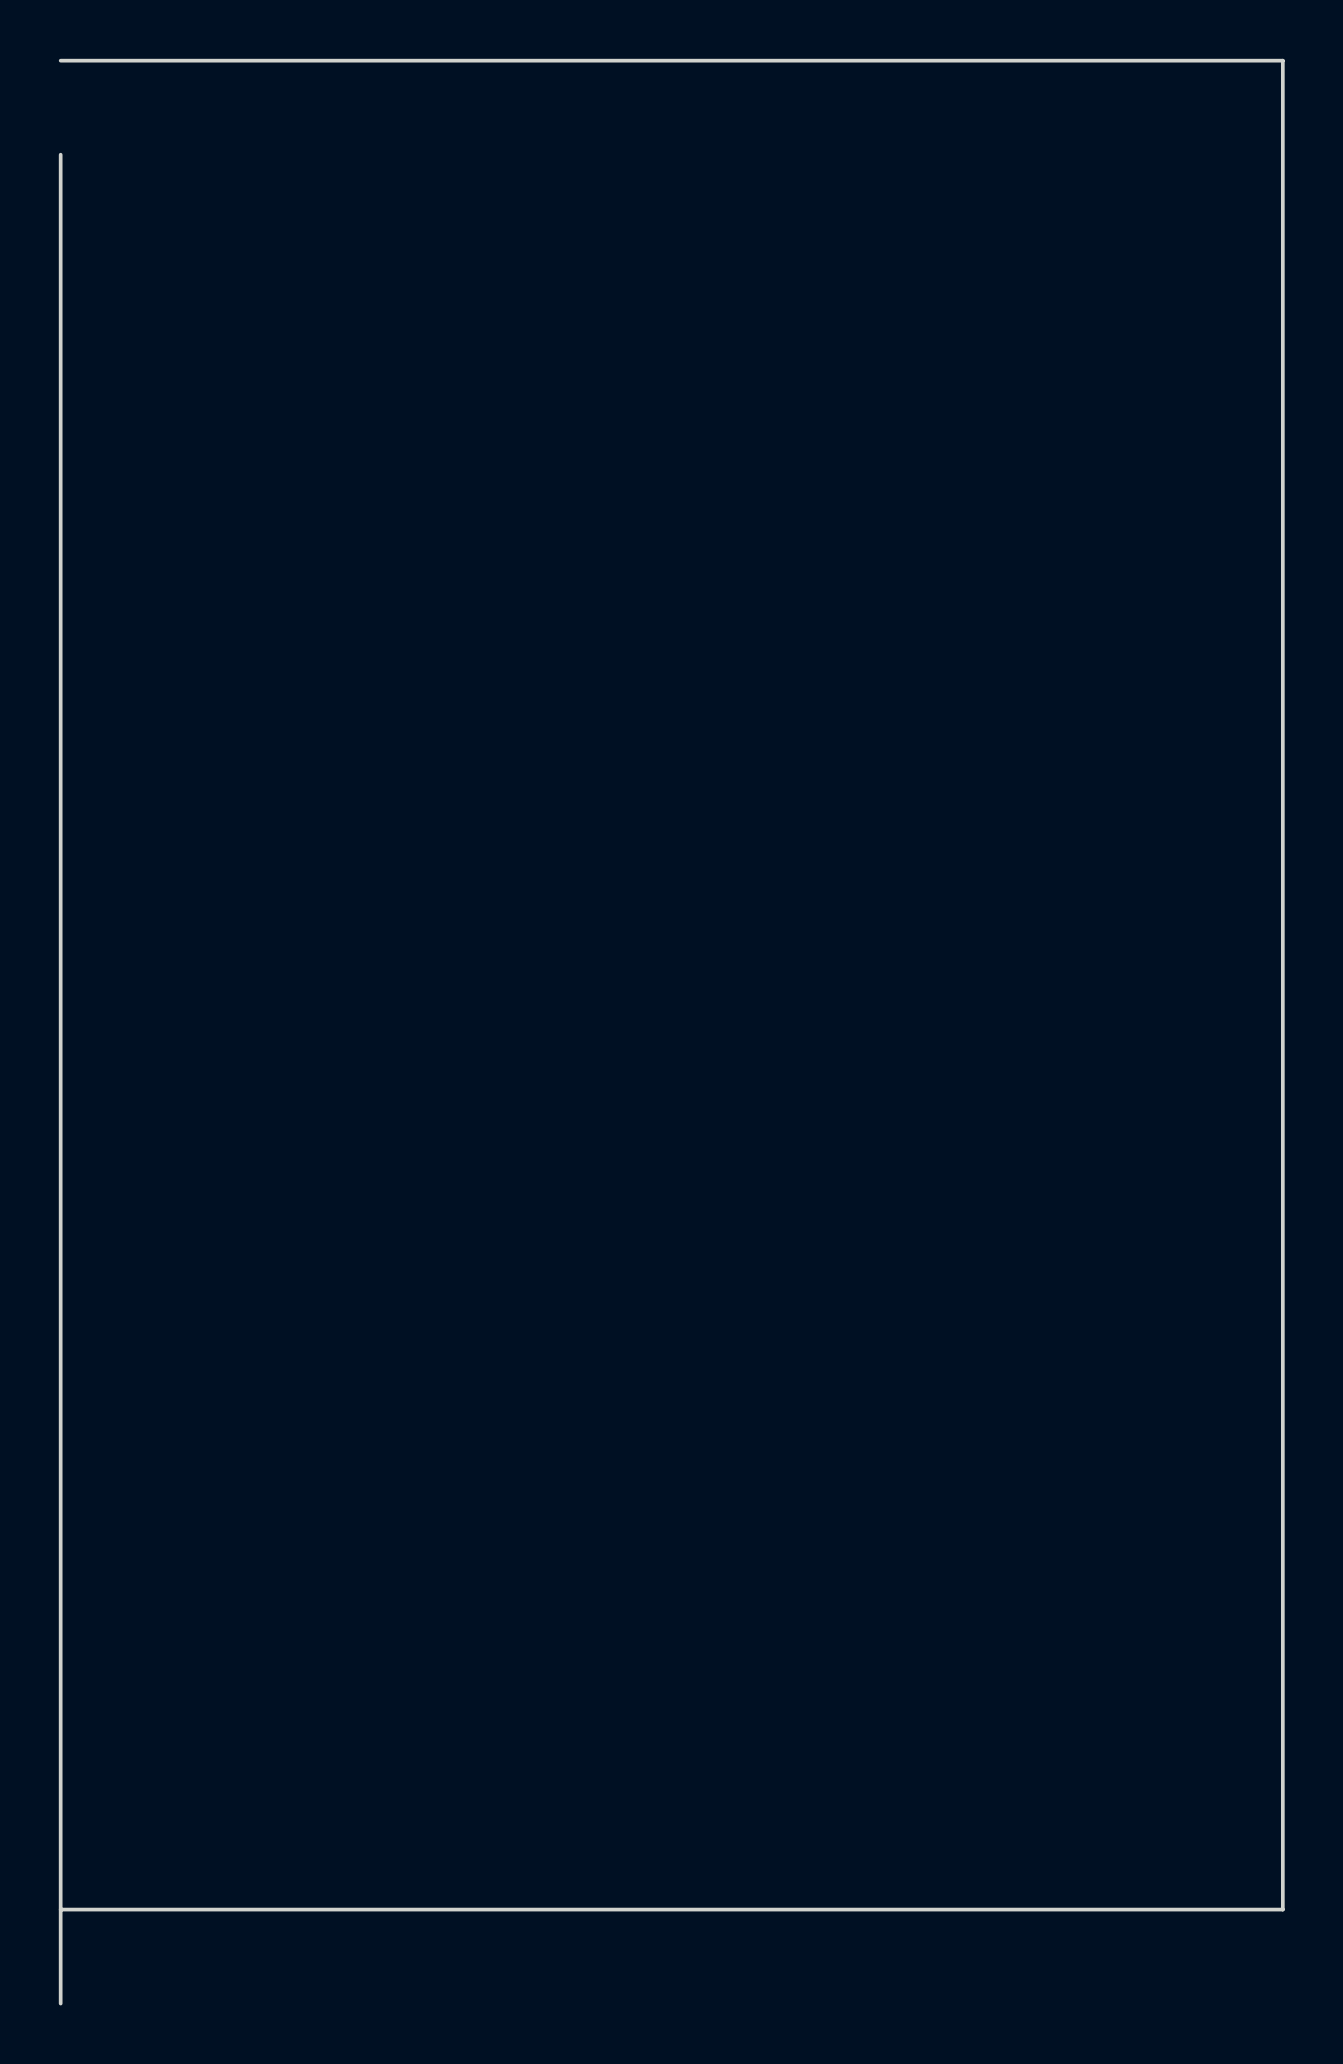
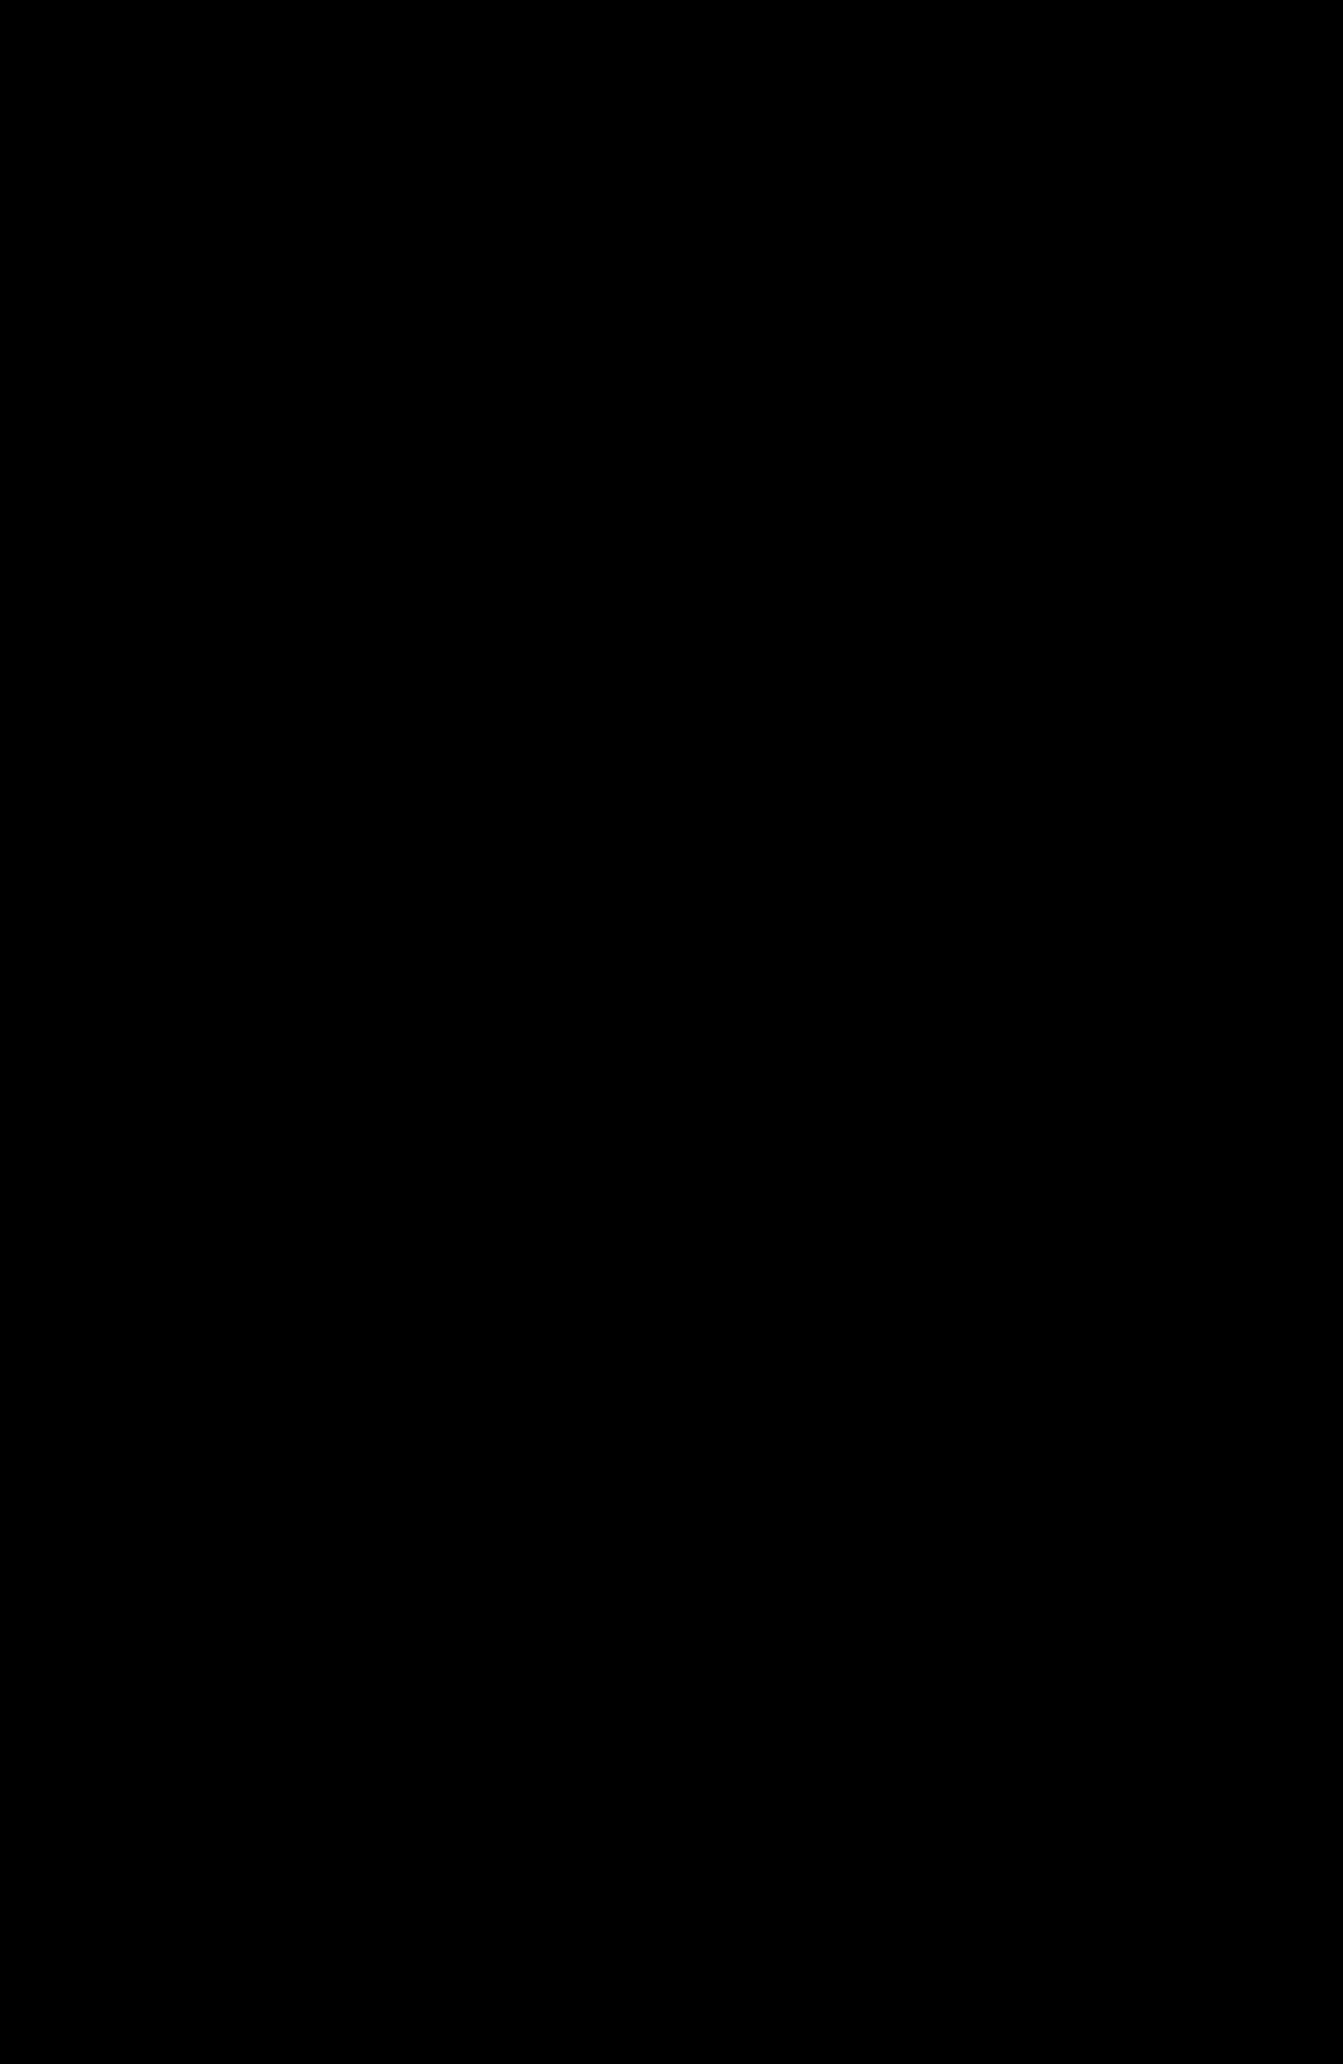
board edge: (60, 60) (1282, 60) (1282, 1909) (60, 1909) -> none
board edge: (60, 154) (60, 2003) -> none

